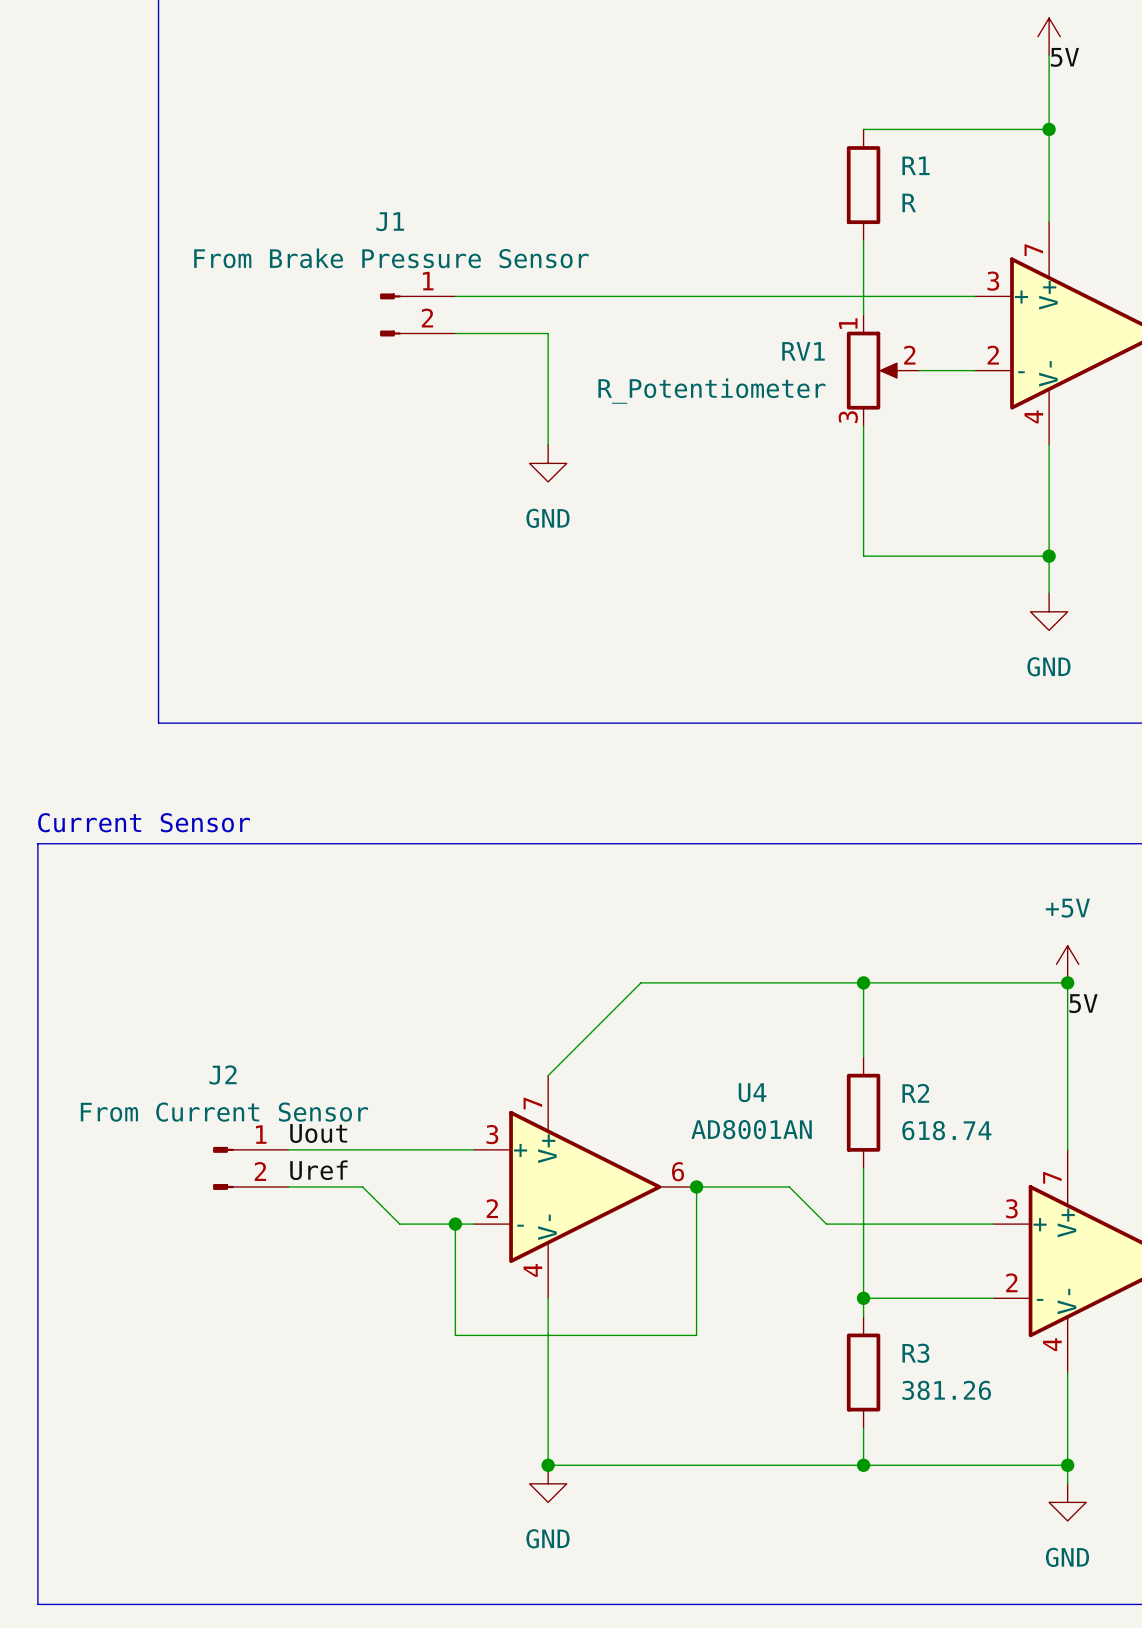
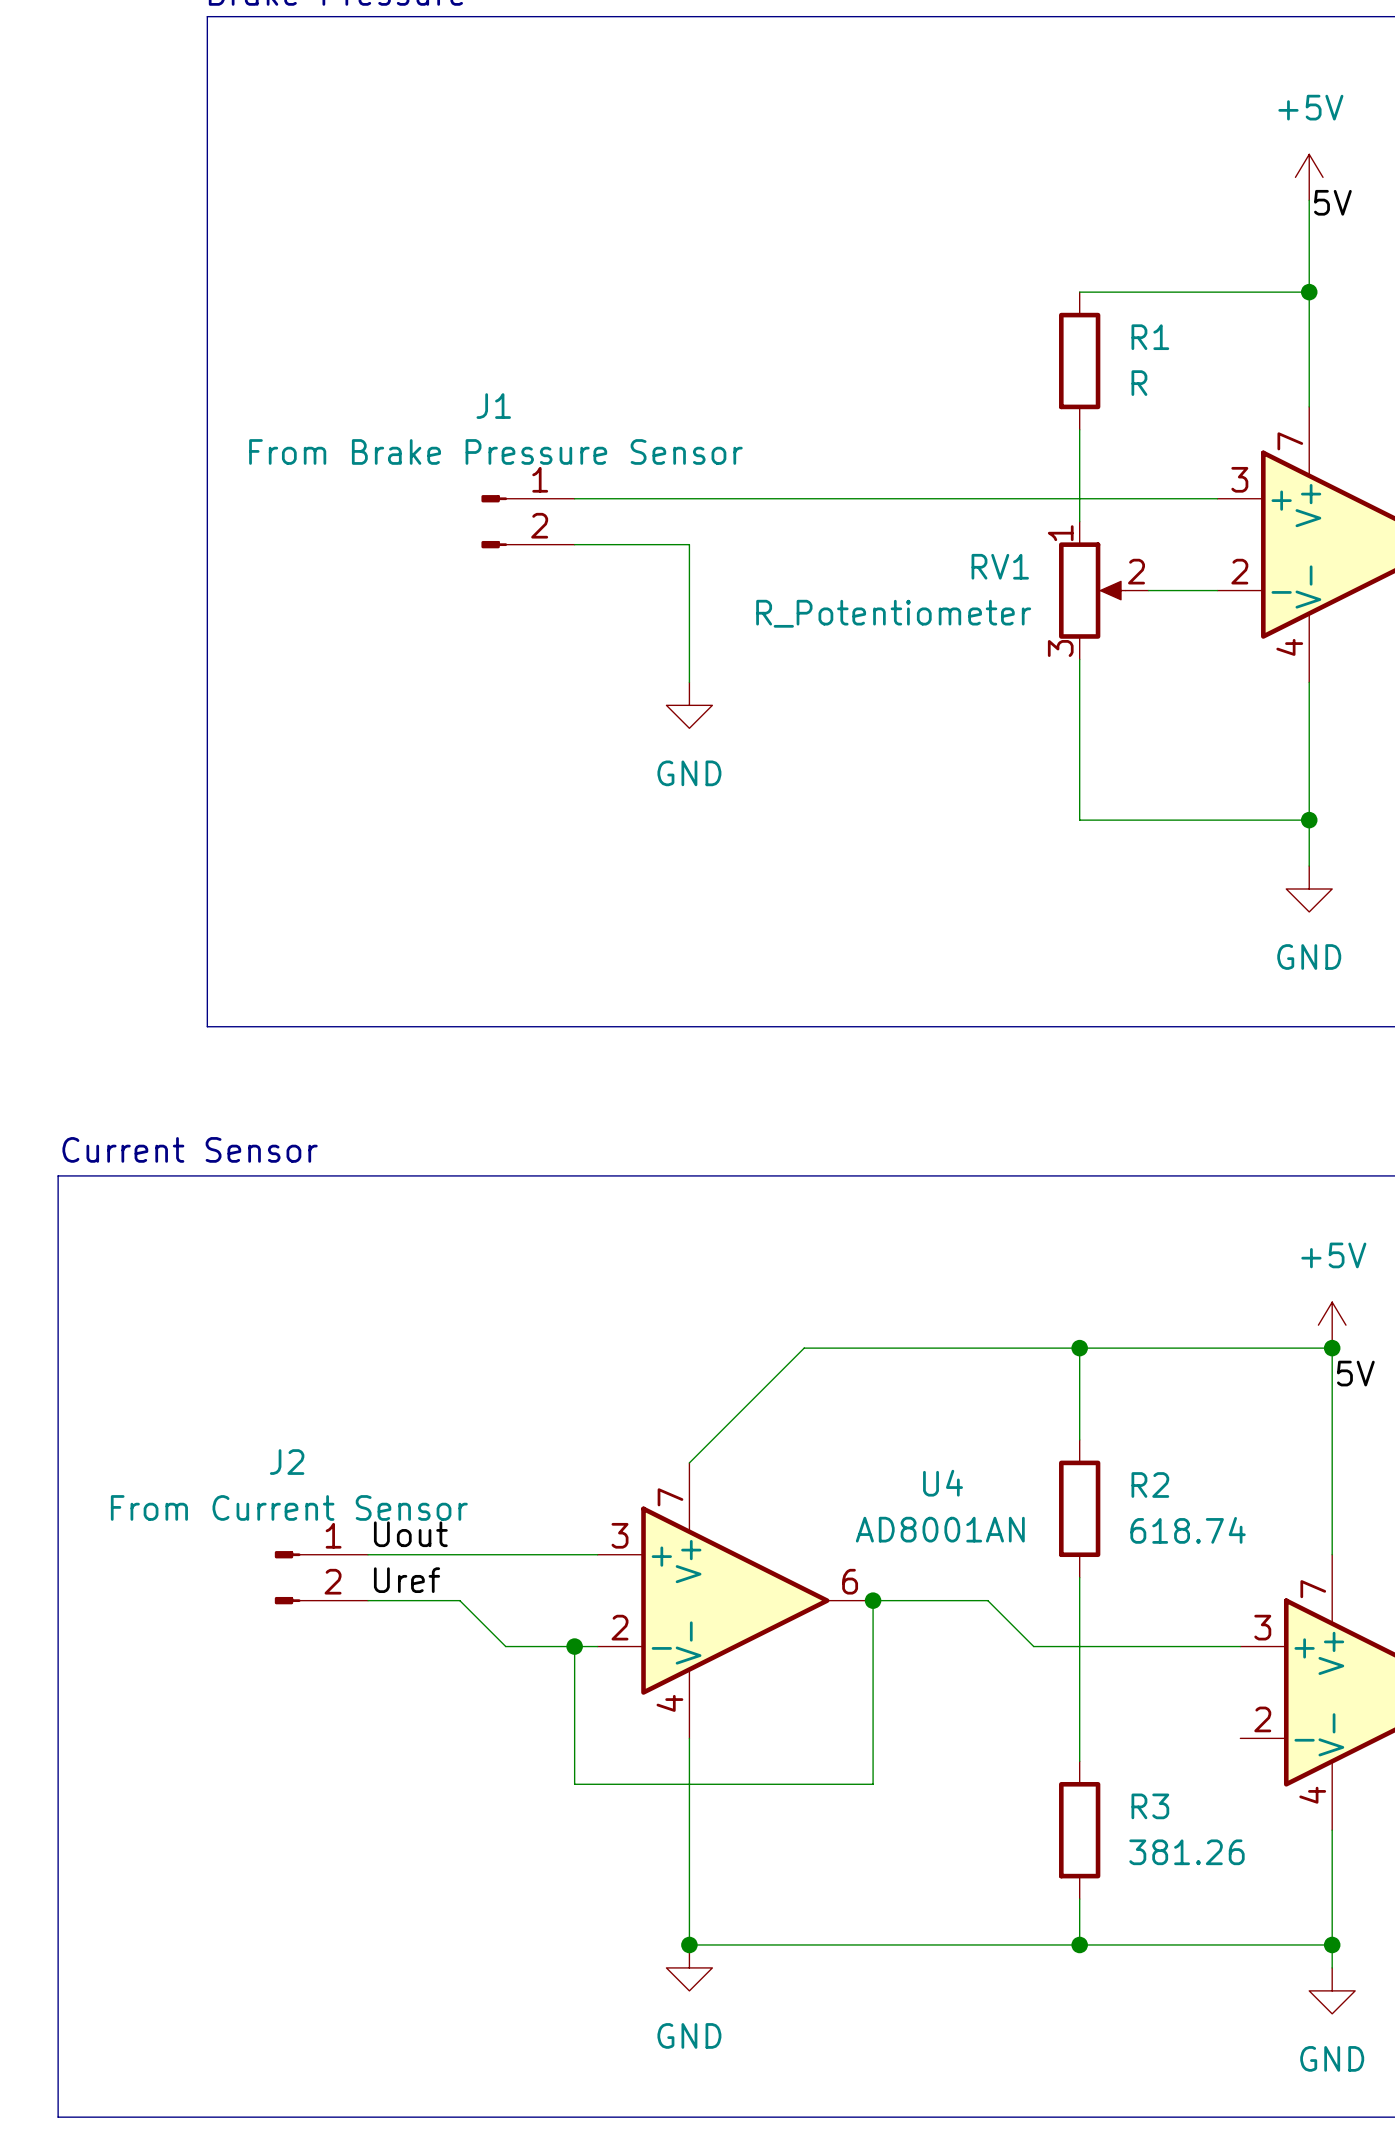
wire: (863, 1298) (993, 1298) -> none
junction: (863, 1298) -> none

